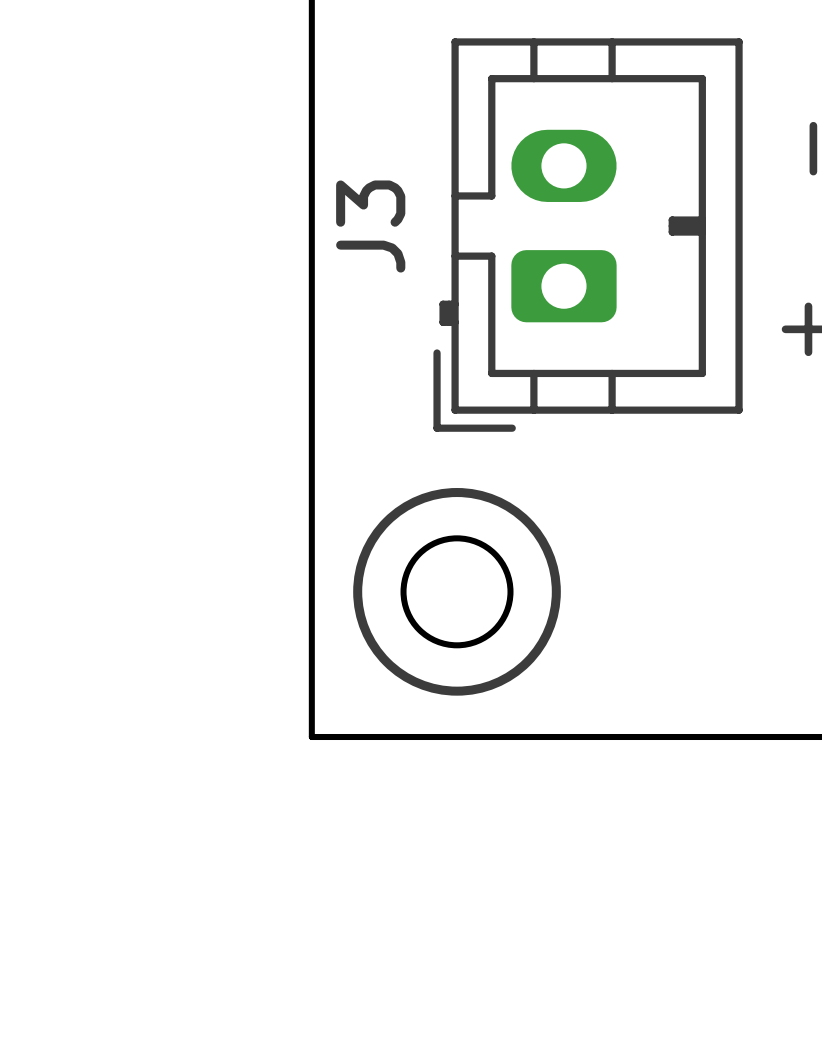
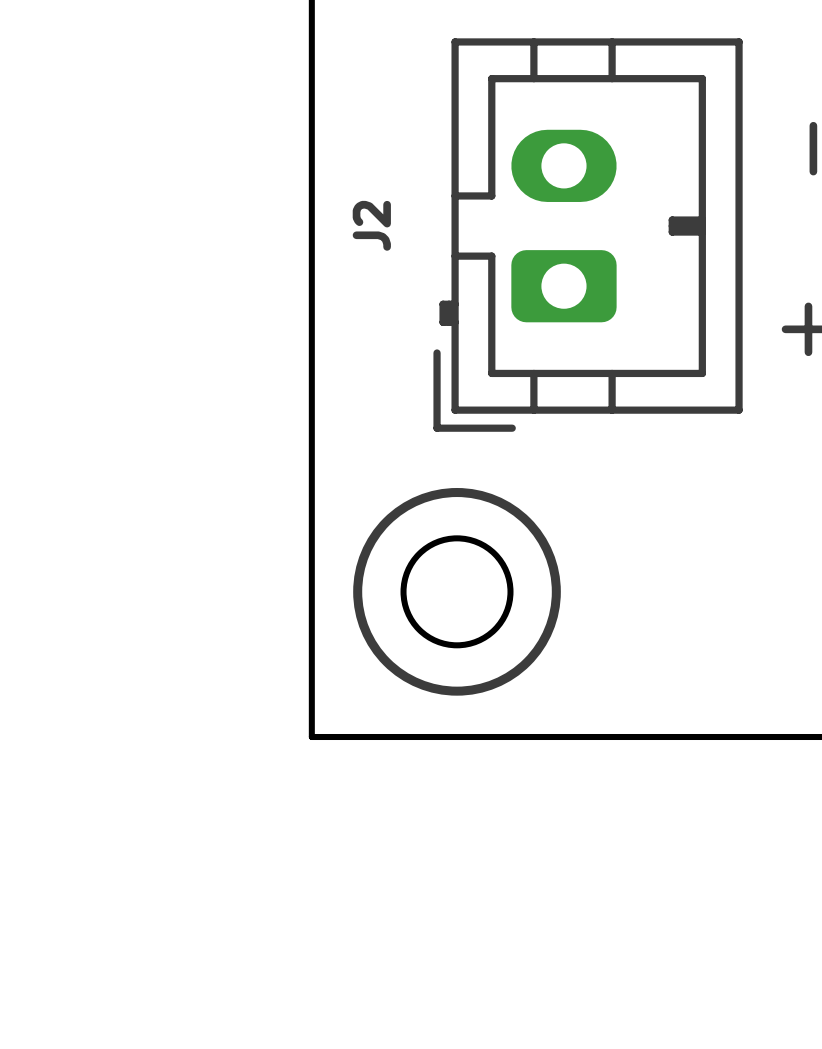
J3 name: J3 (370, 226) -> J2 (371, 225)

